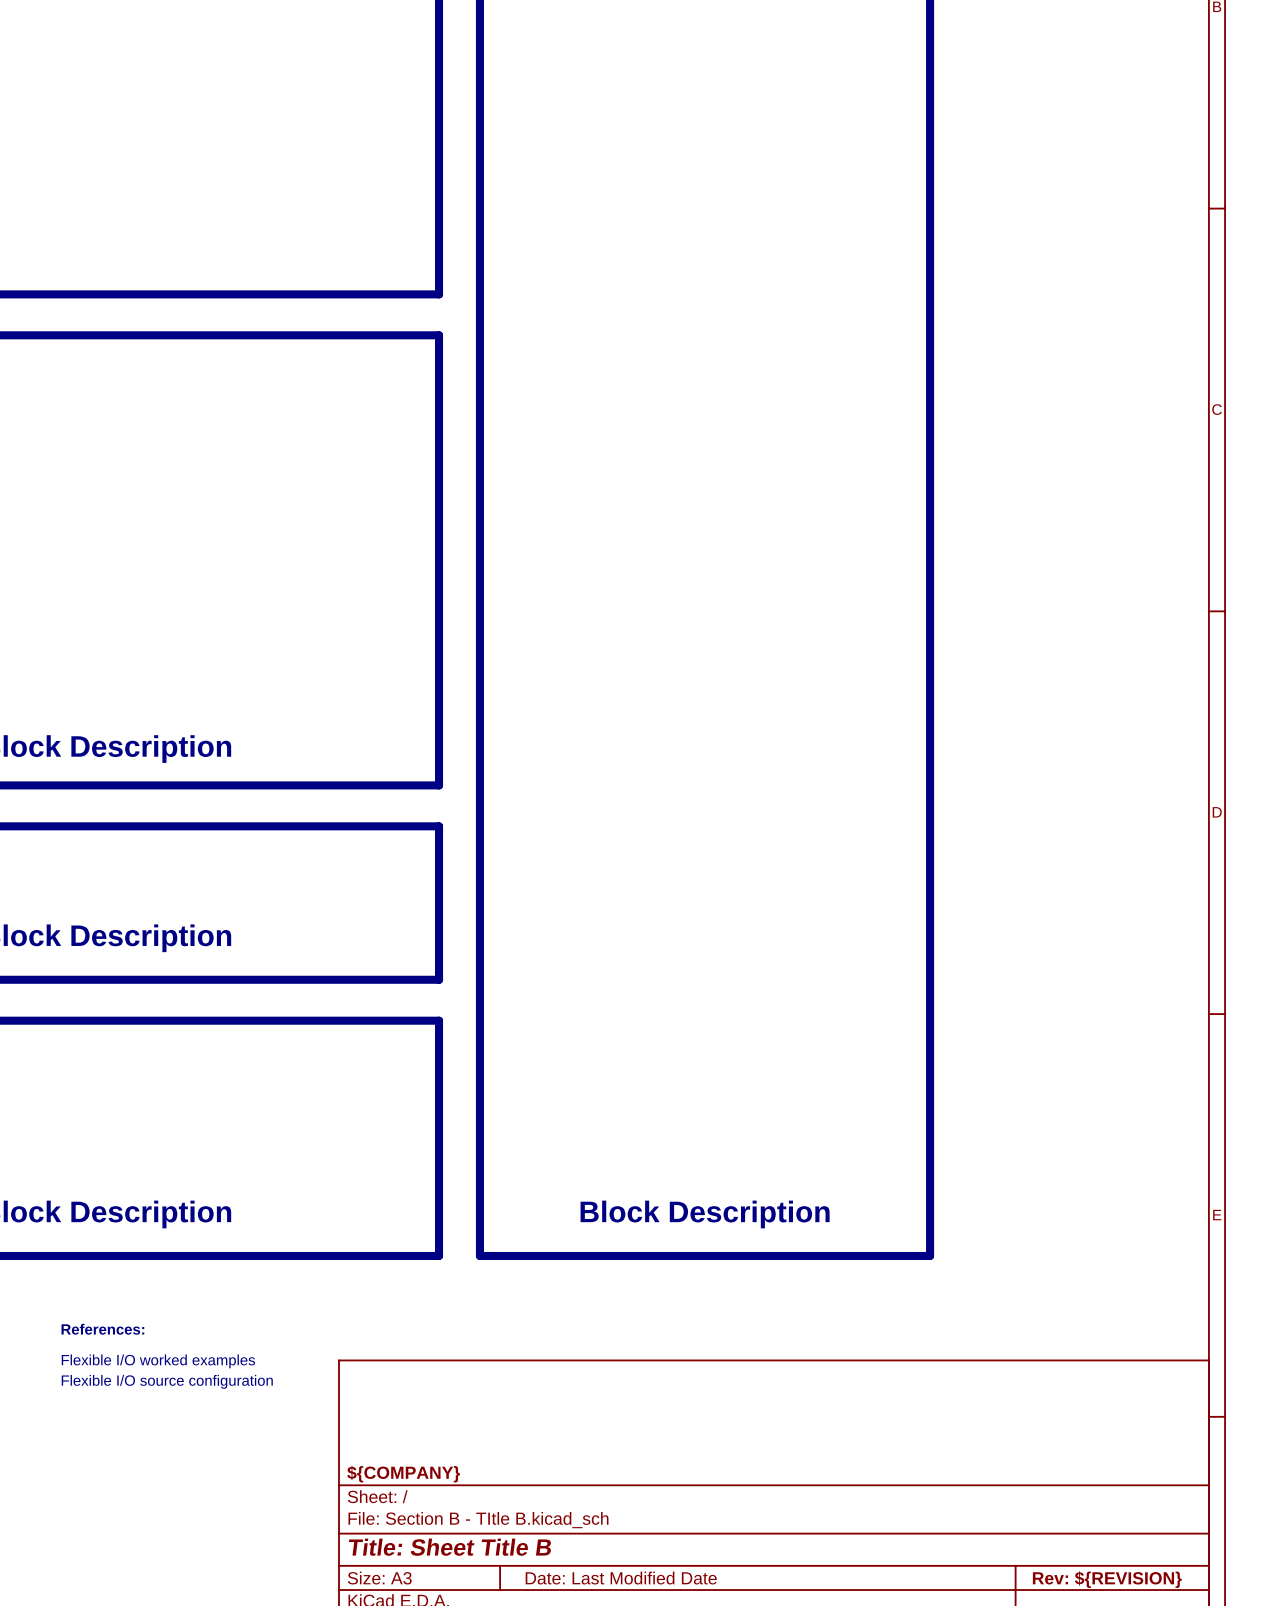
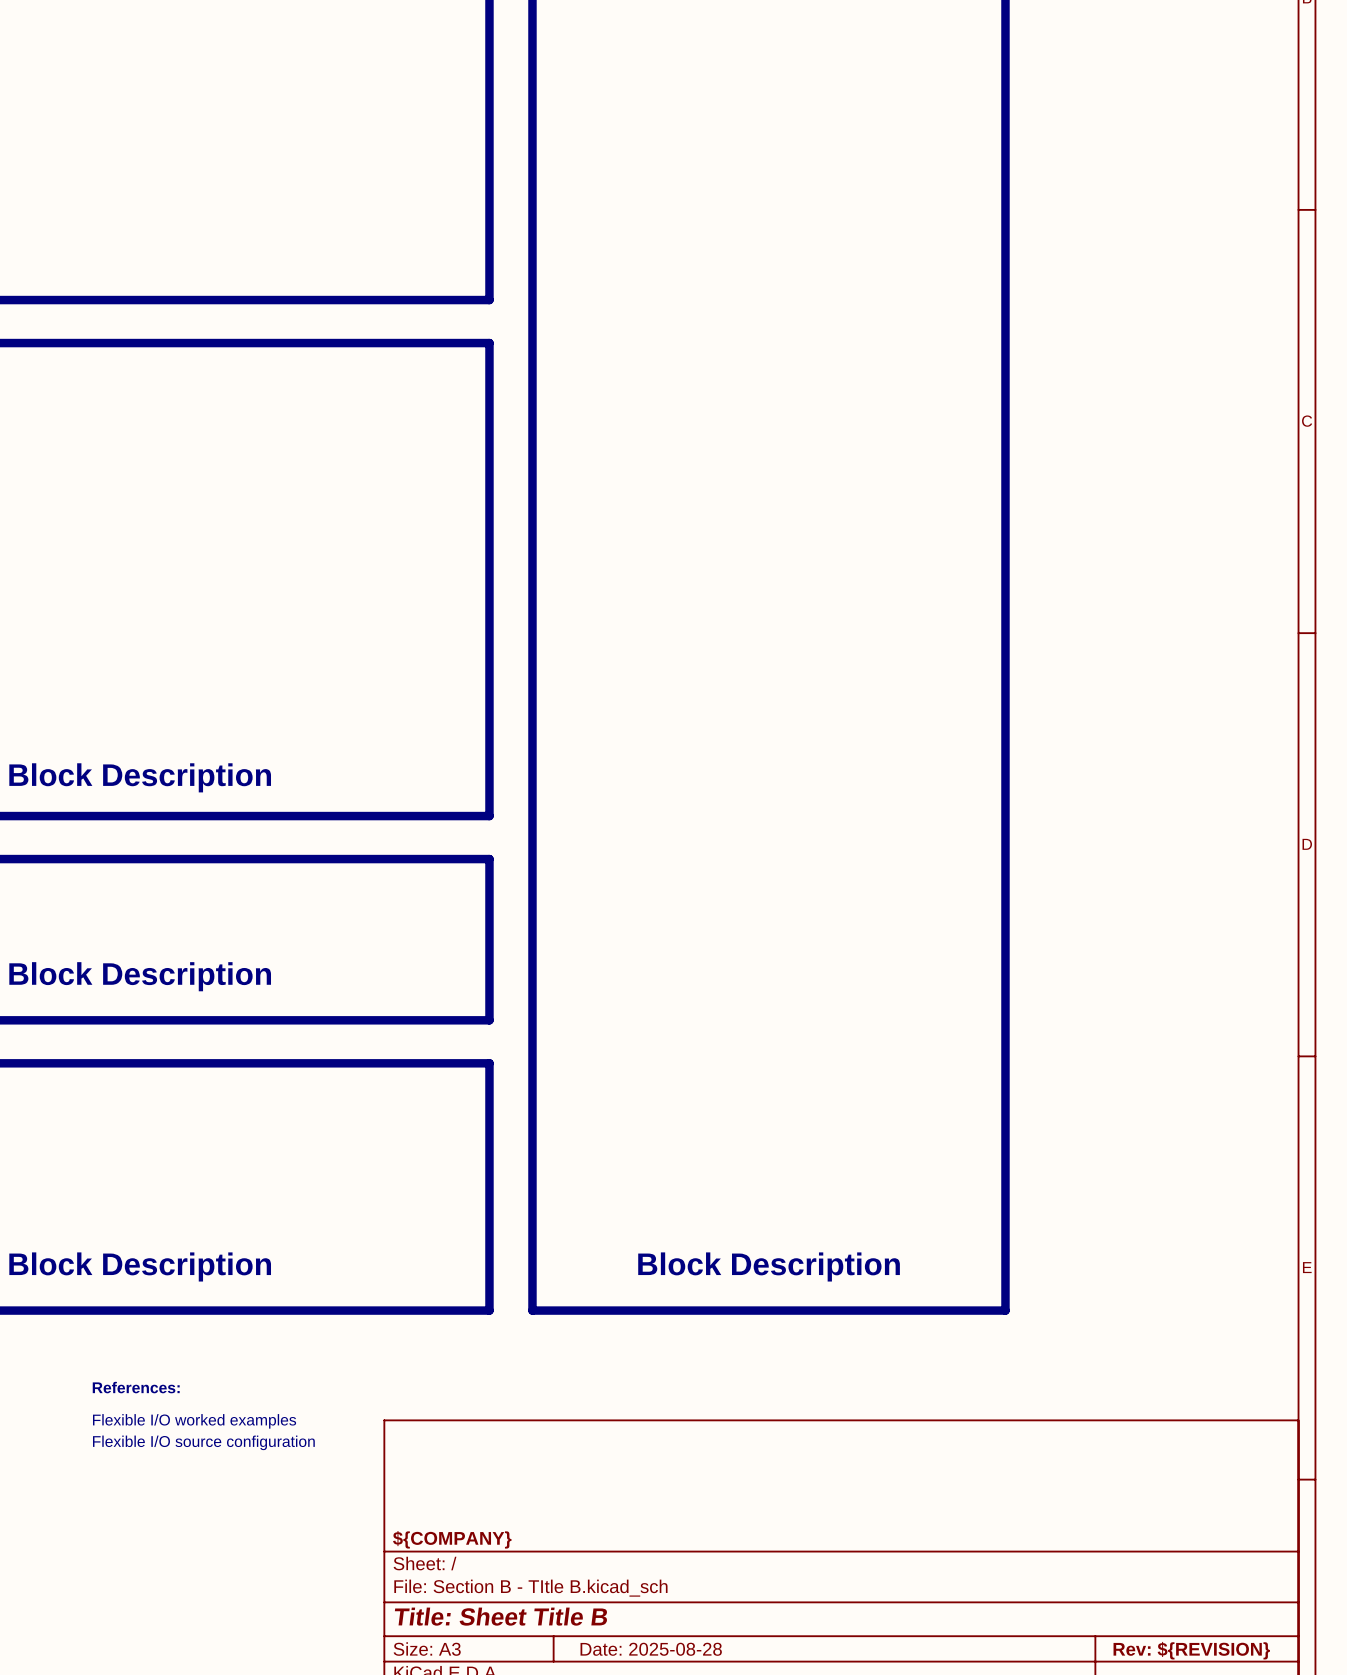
title block: Date: Last Modified Date (621, 1578) -> Date: 2025-08-28 (651, 1649)

